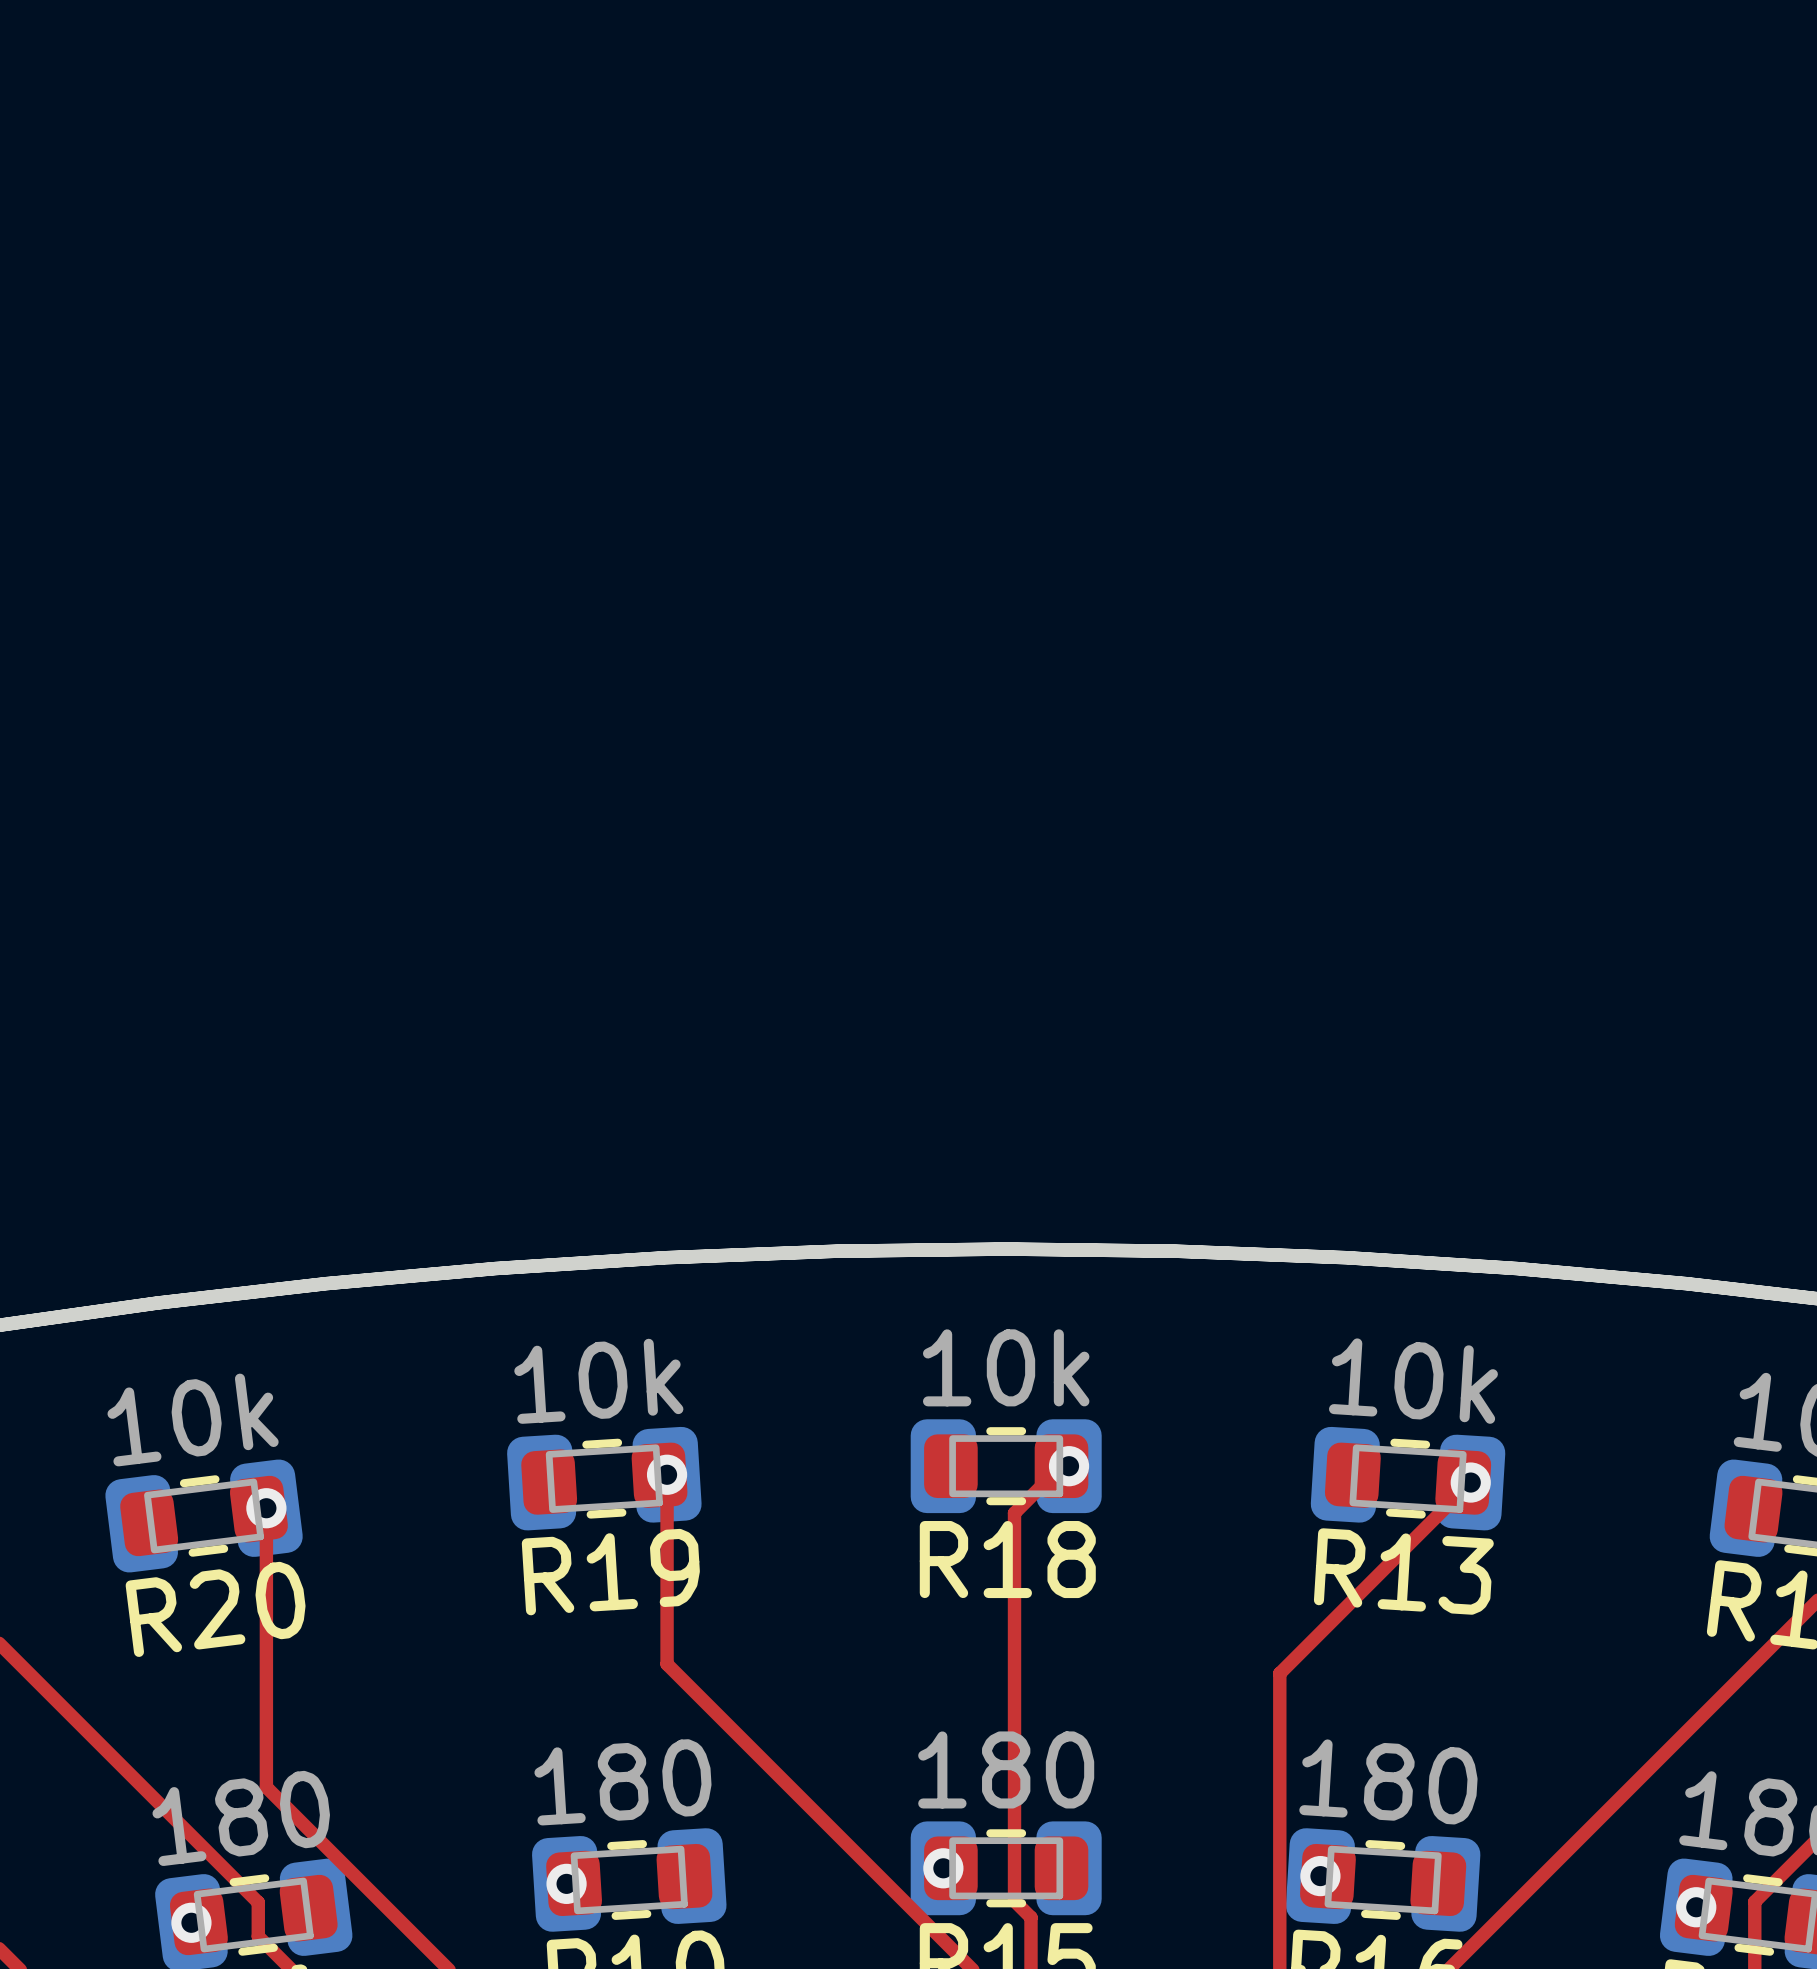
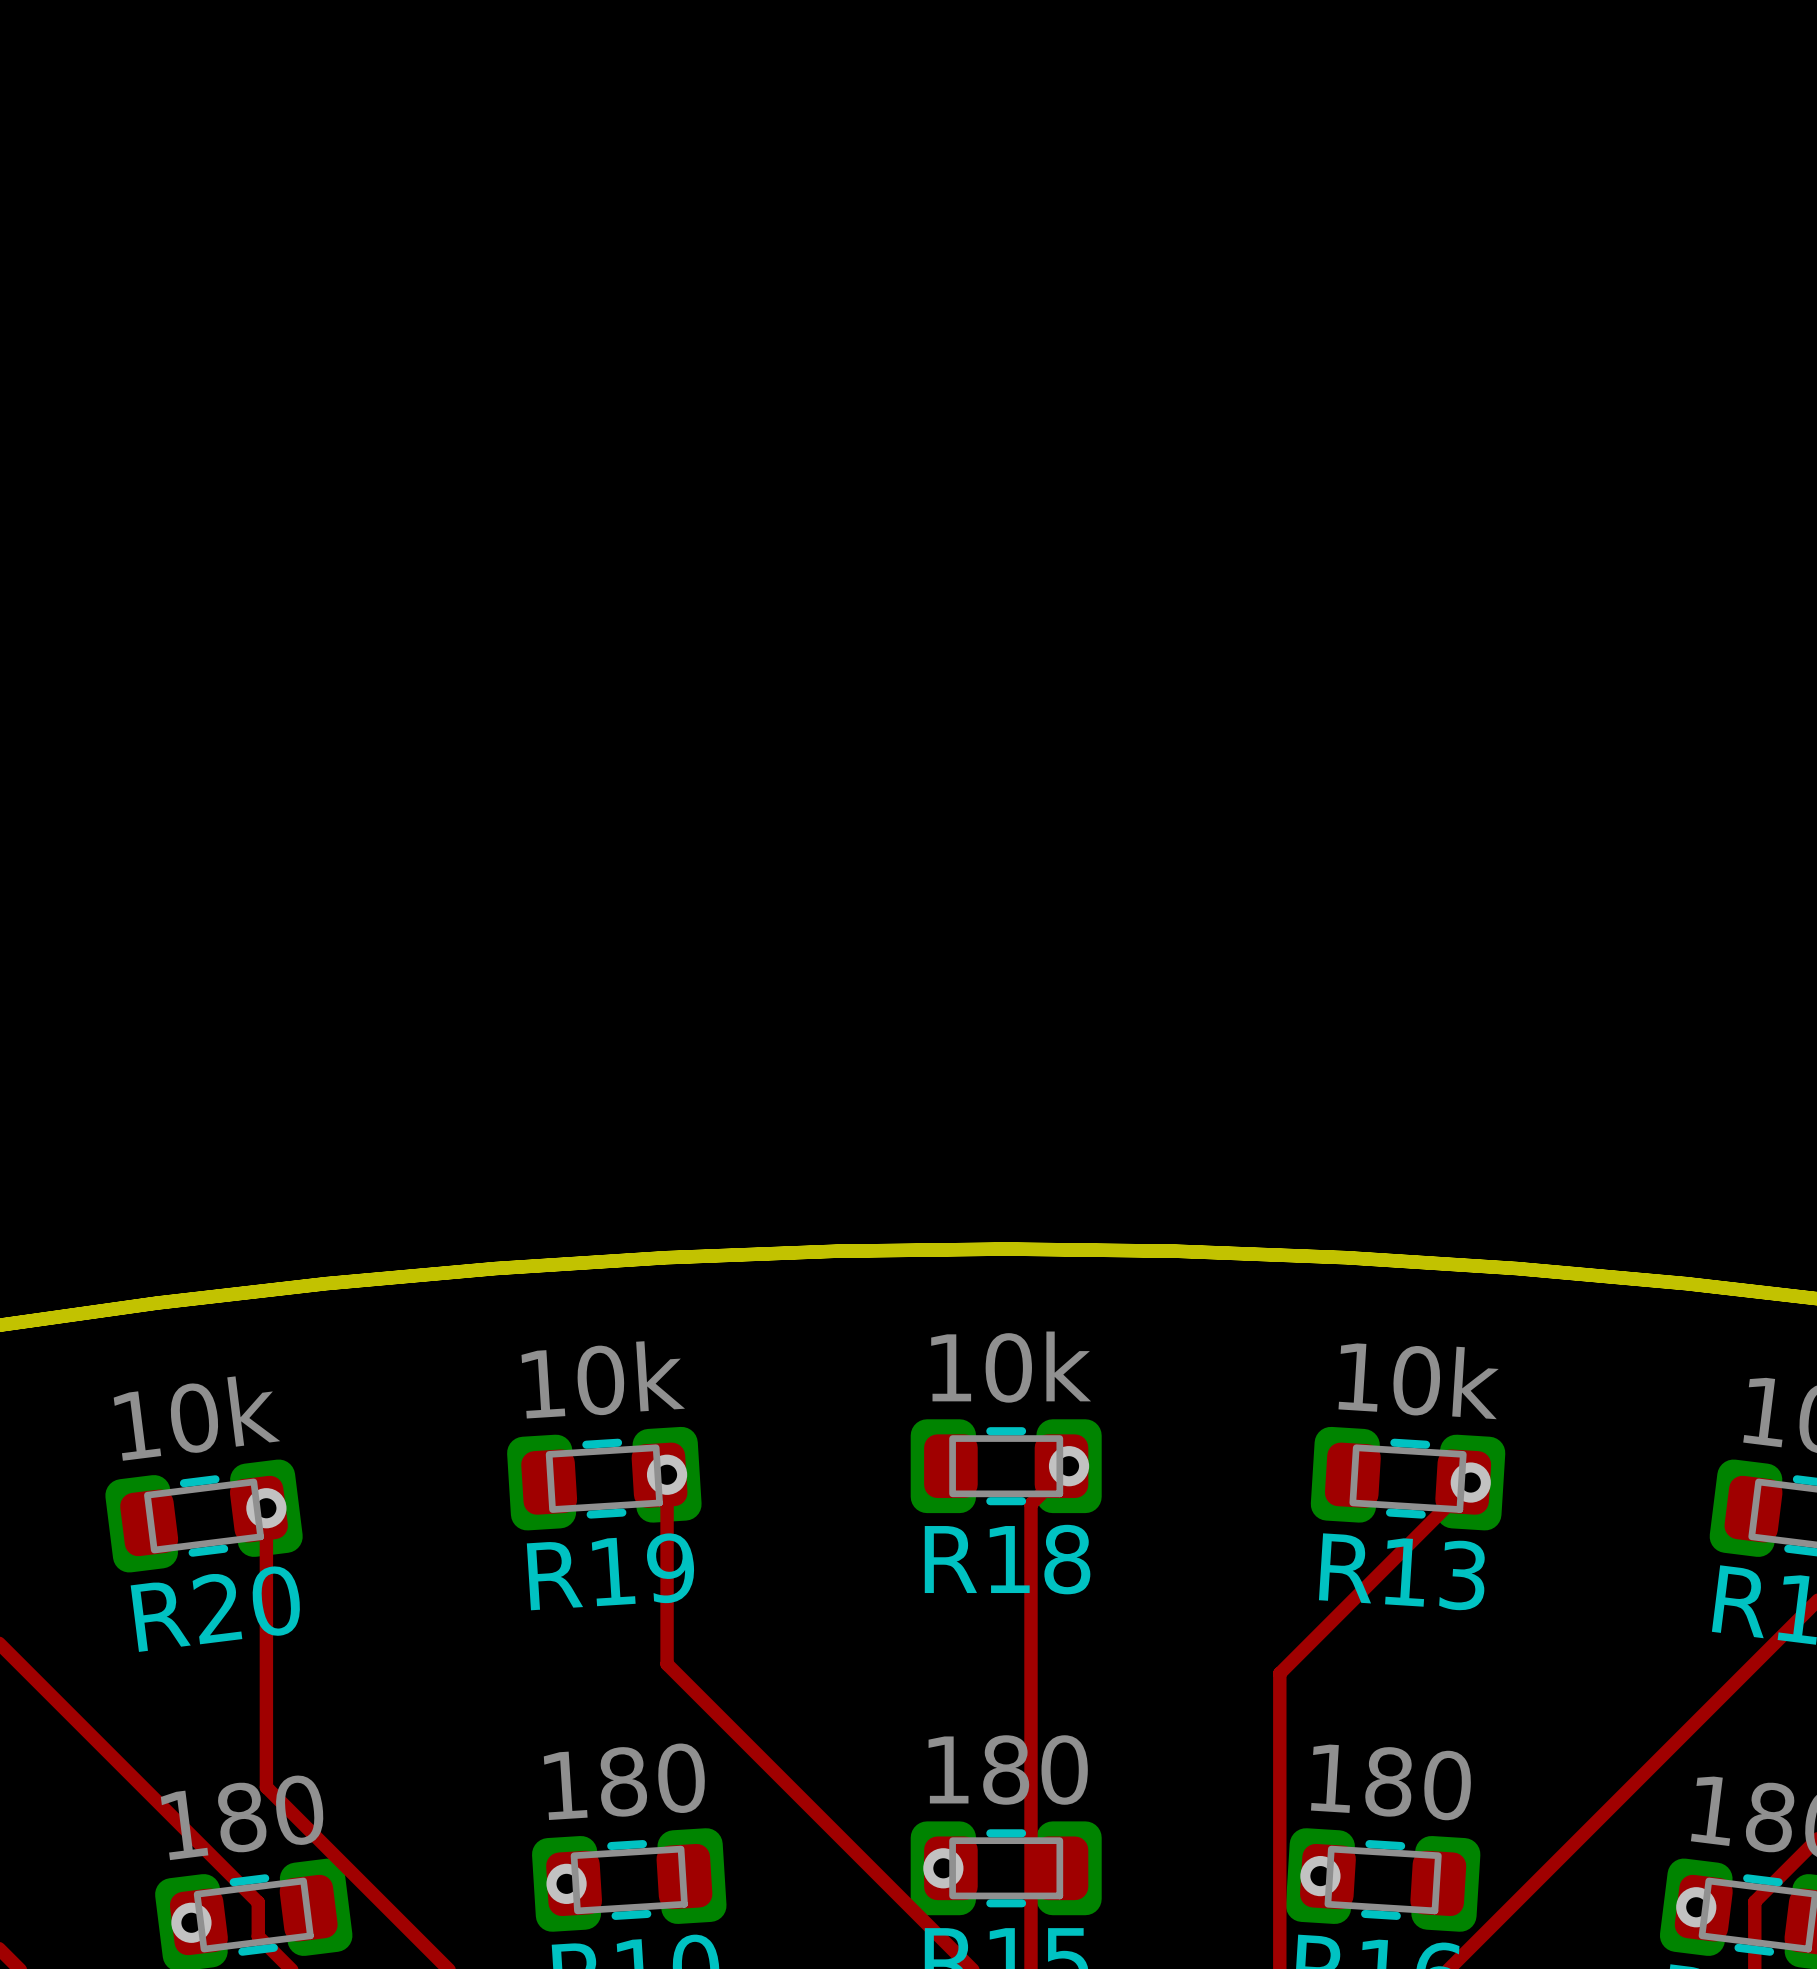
top track: (1061, 1466) (1014, 1513) (1014, 1901) (1030, 1917) -> (1069, 1466) (1030, 1504) (1030, 1917)

